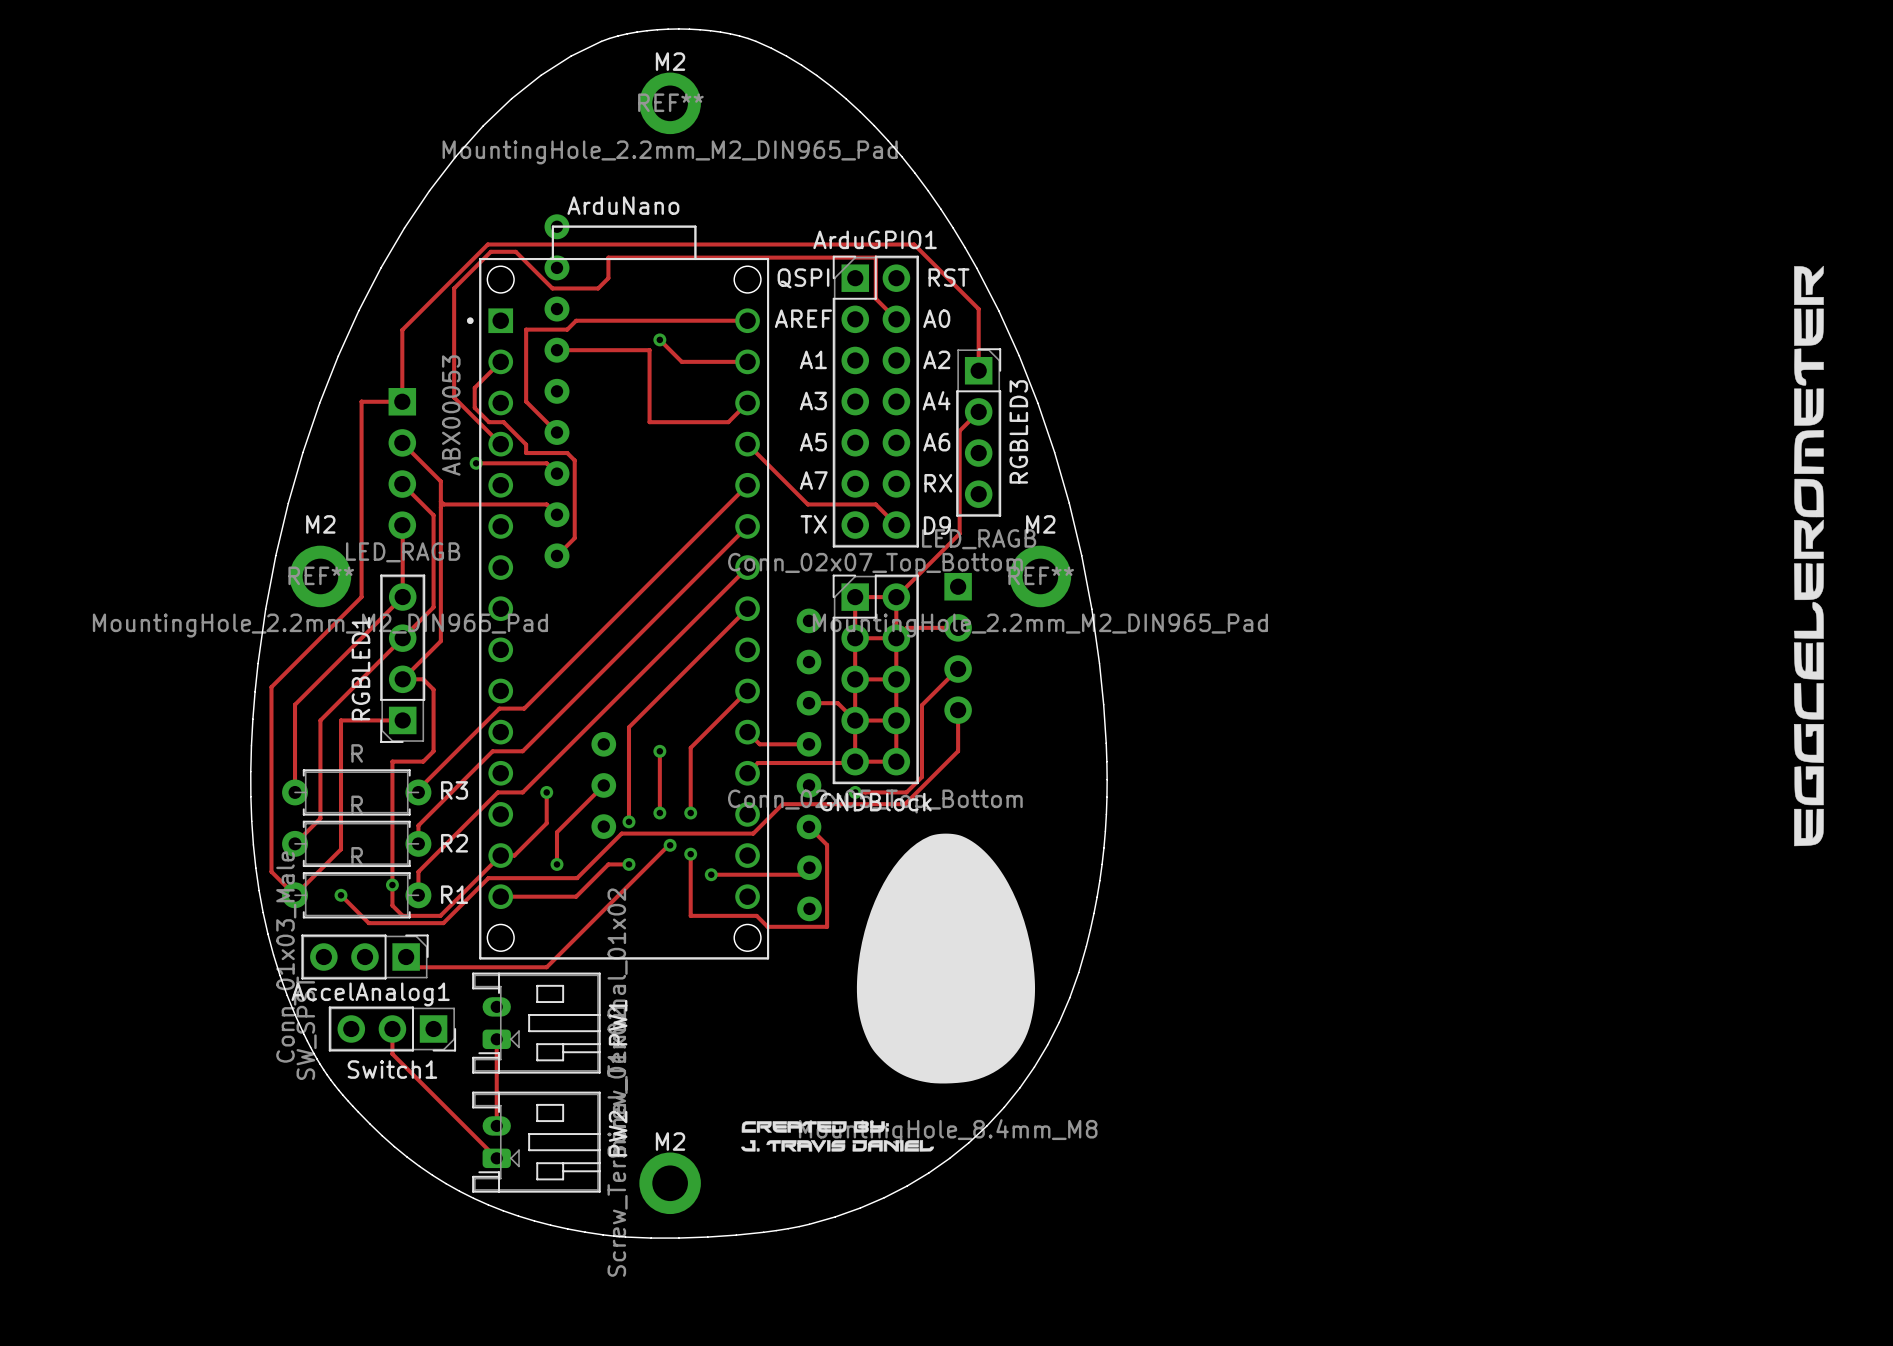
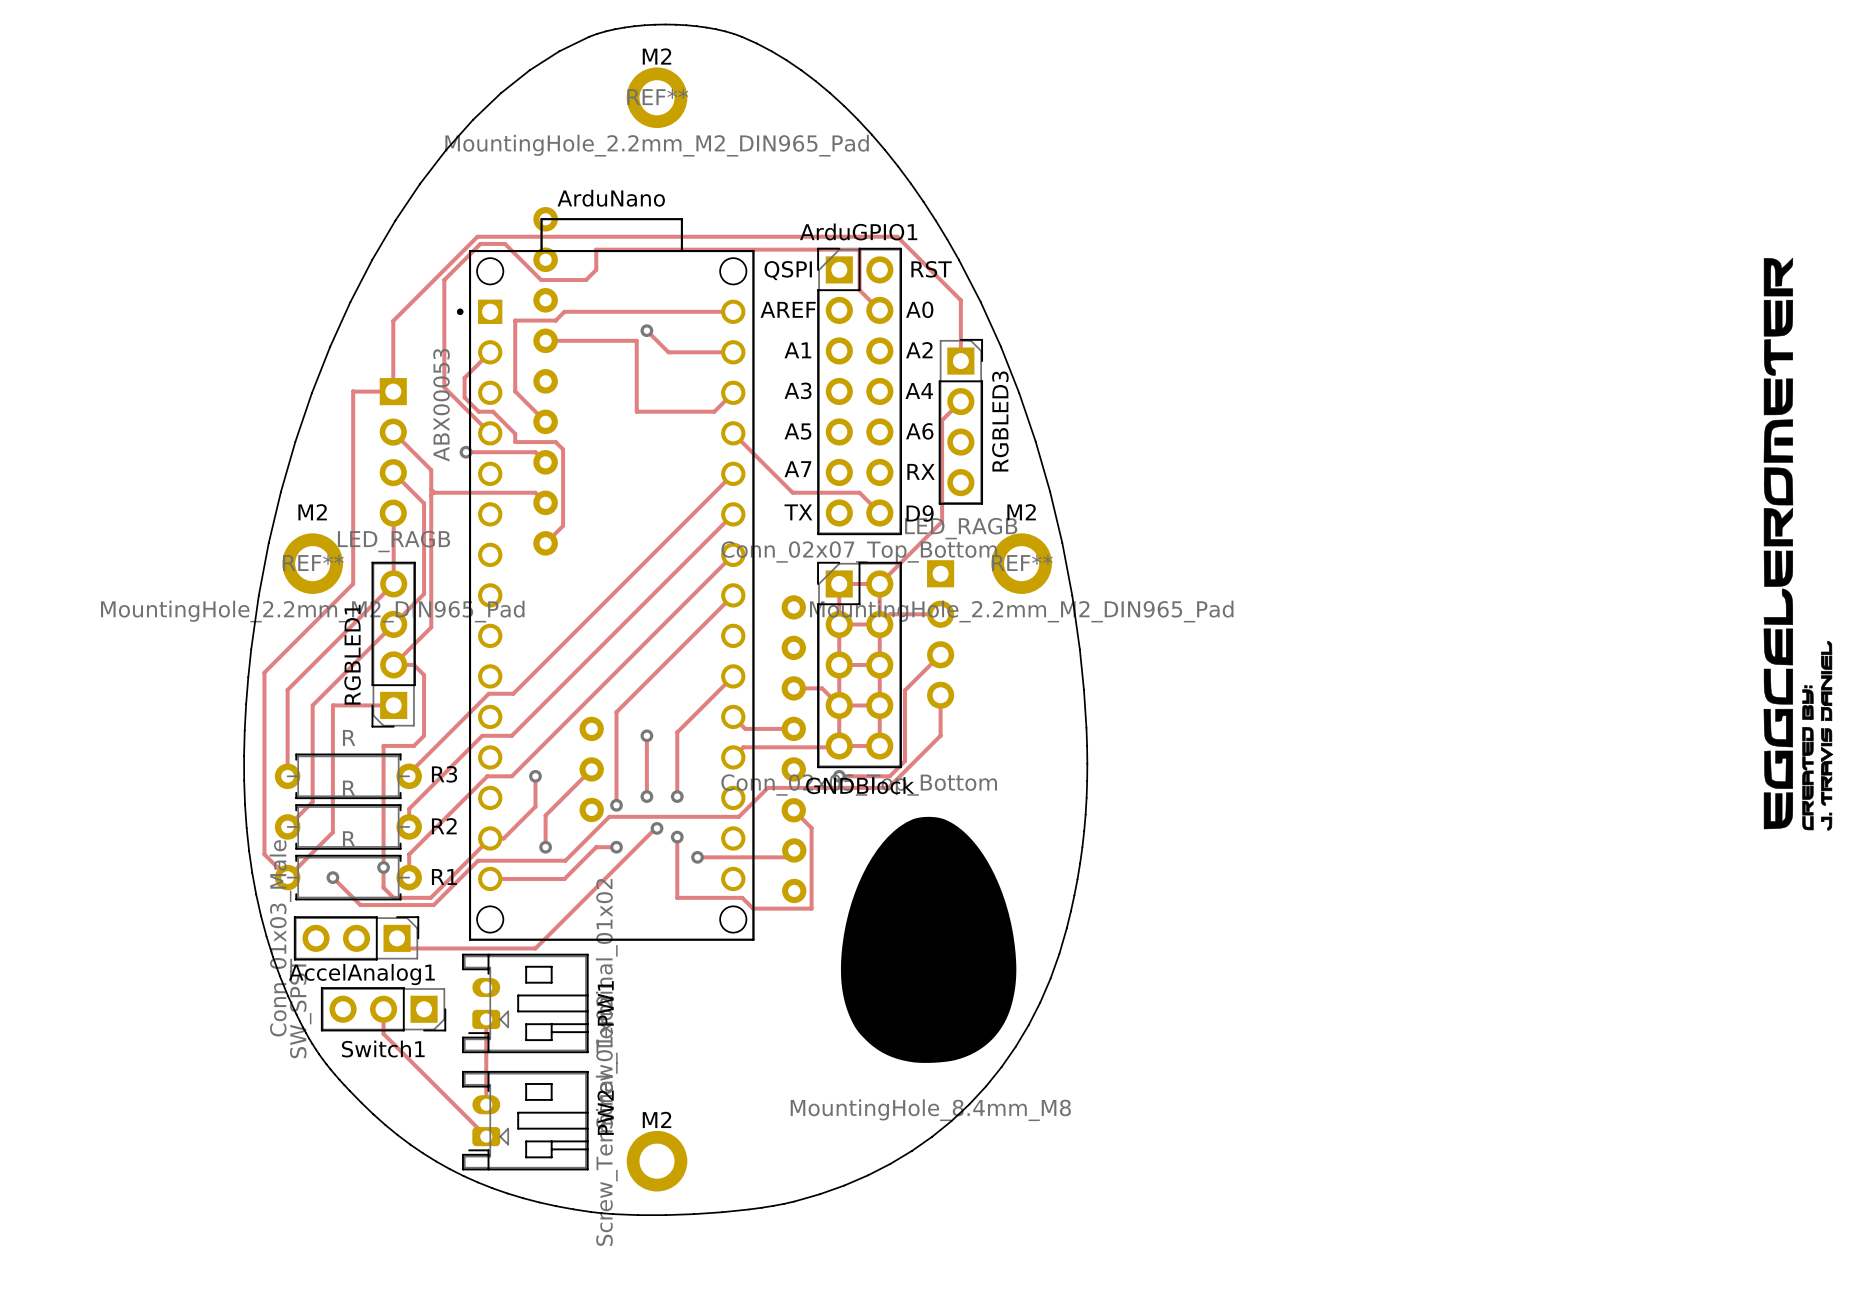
drawing: none -> [1802, 640, 1834, 831]
drawing: [741, 1121, 935, 1153] -> none

